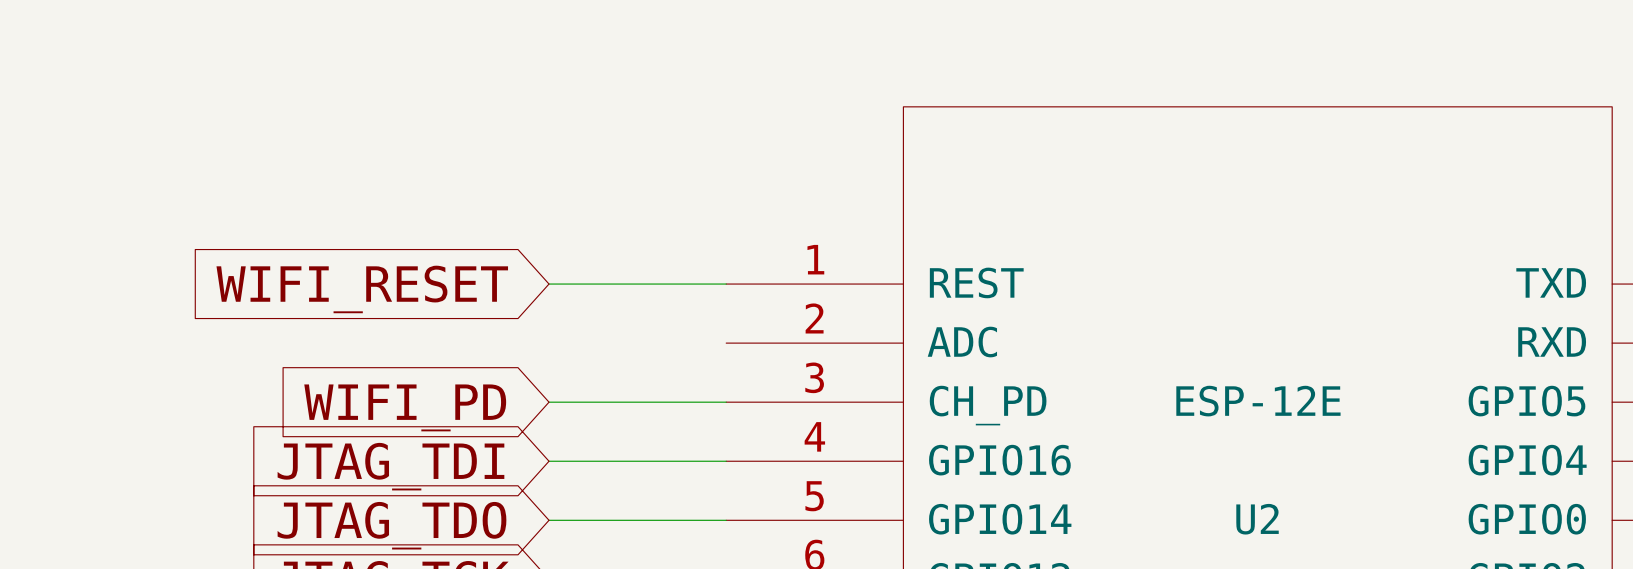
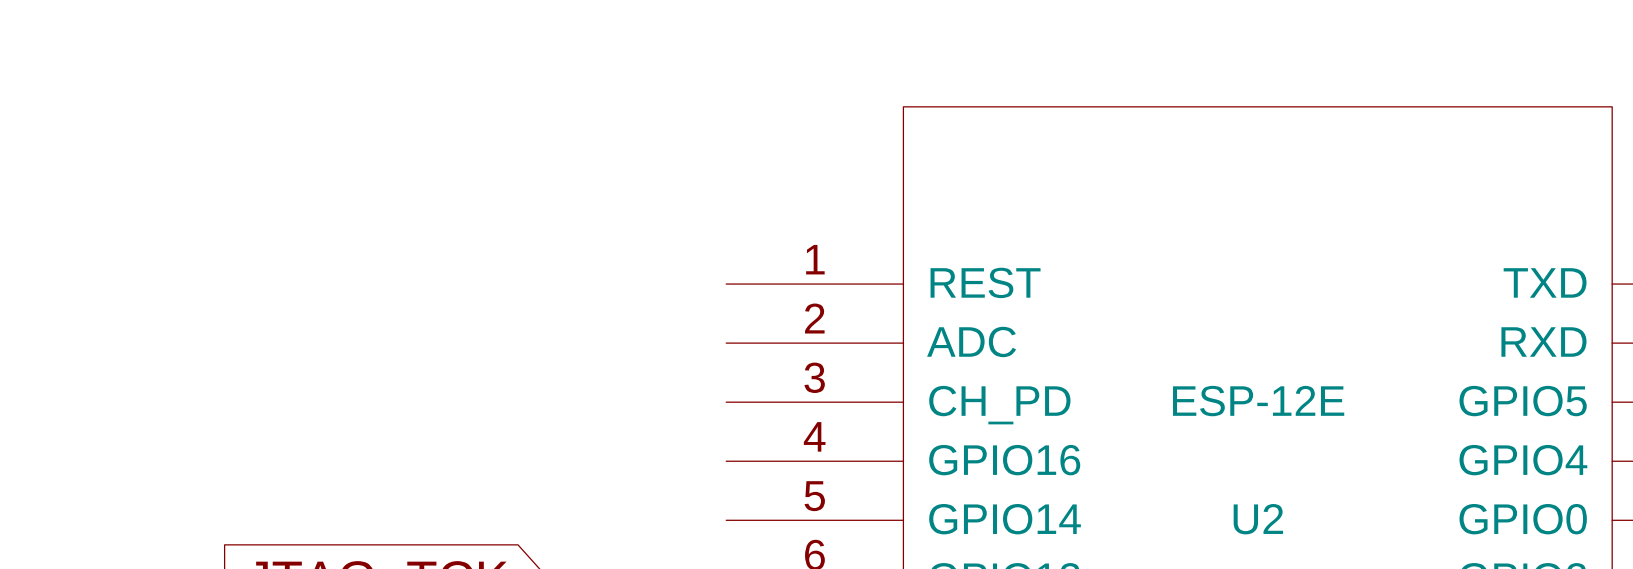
wire: (549, 284) (726, 284) -> none
global label: WIFI_RESET (362, 289) -> none
wire: (549, 402) (726, 402) -> none
global label: WIFI_PD (405, 407) -> none
wire: (549, 461) (726, 461) -> none
global label: JTAG_TDI (390, 466) -> none
wire: (549, 520) (726, 520) -> none
global label: JTAG_TDO (391, 525) -> none

